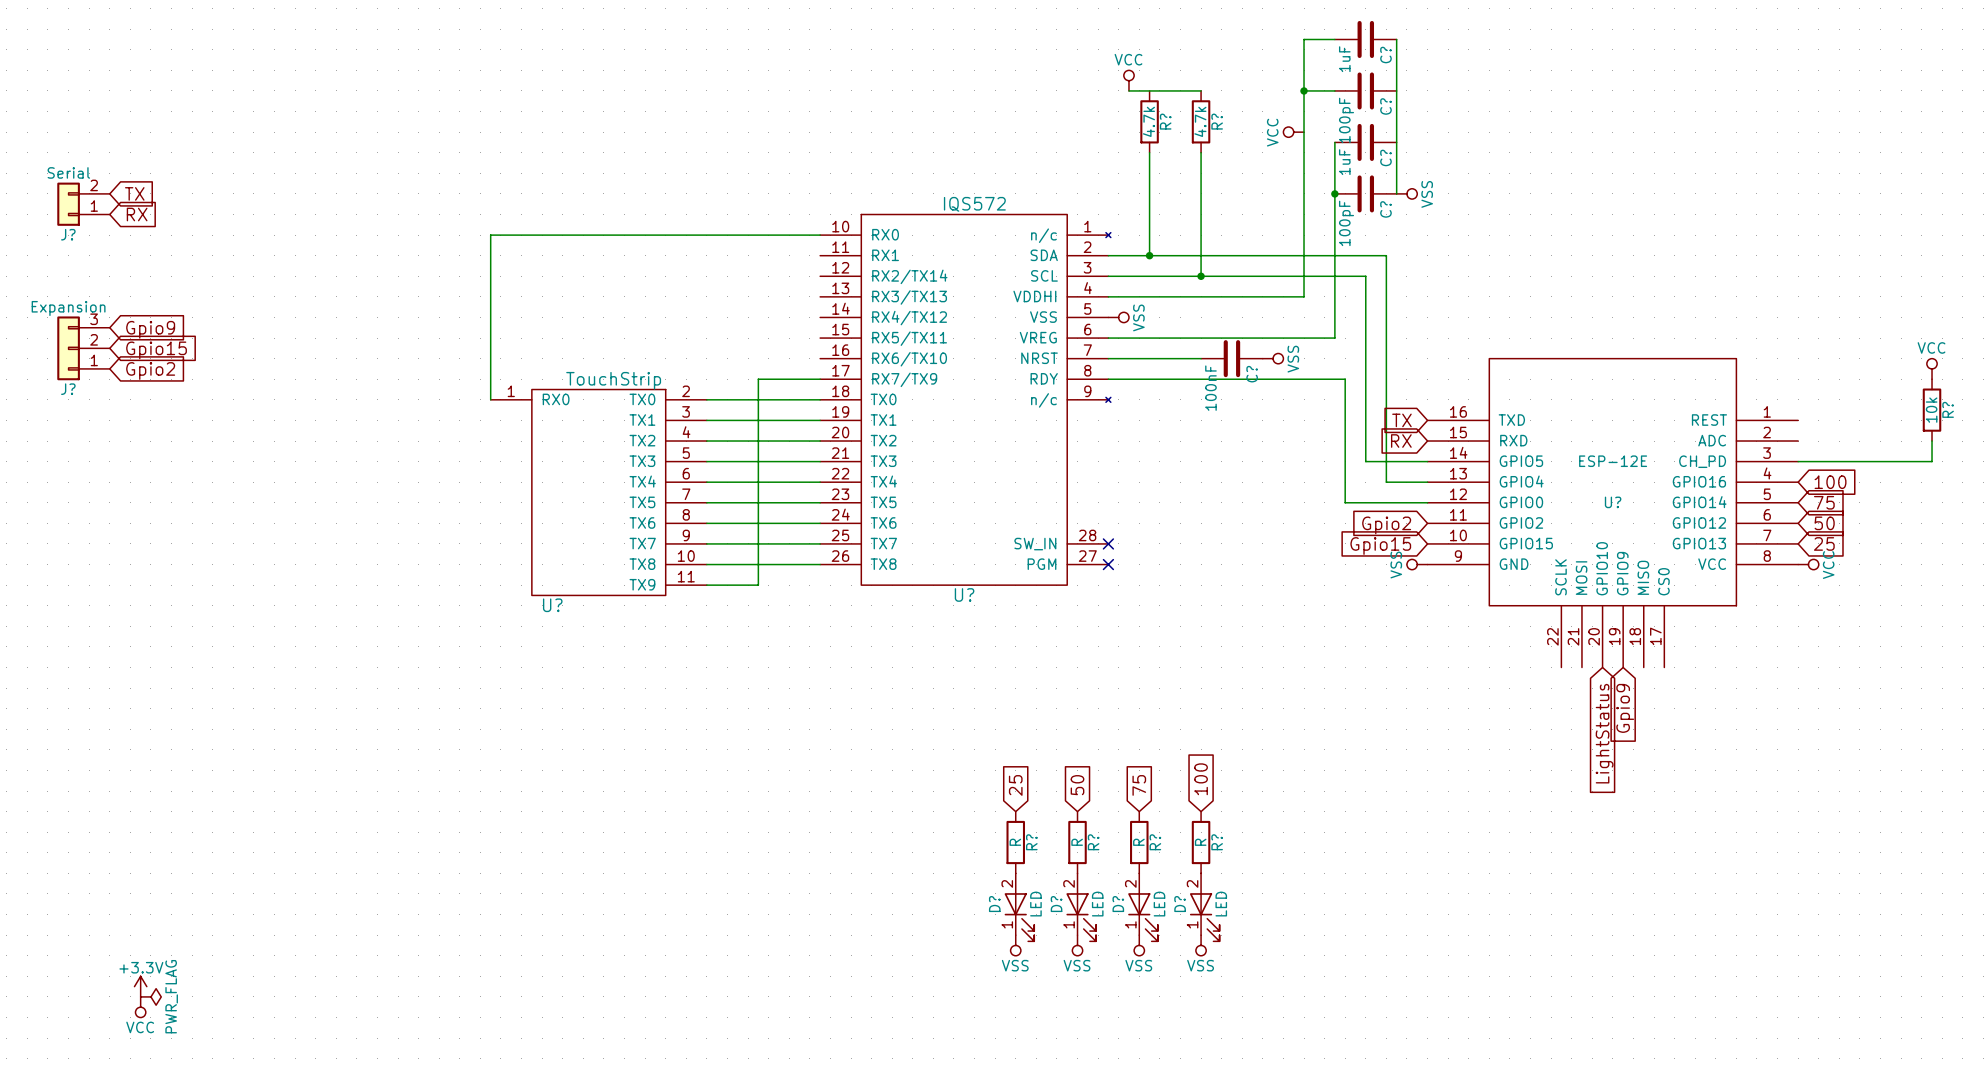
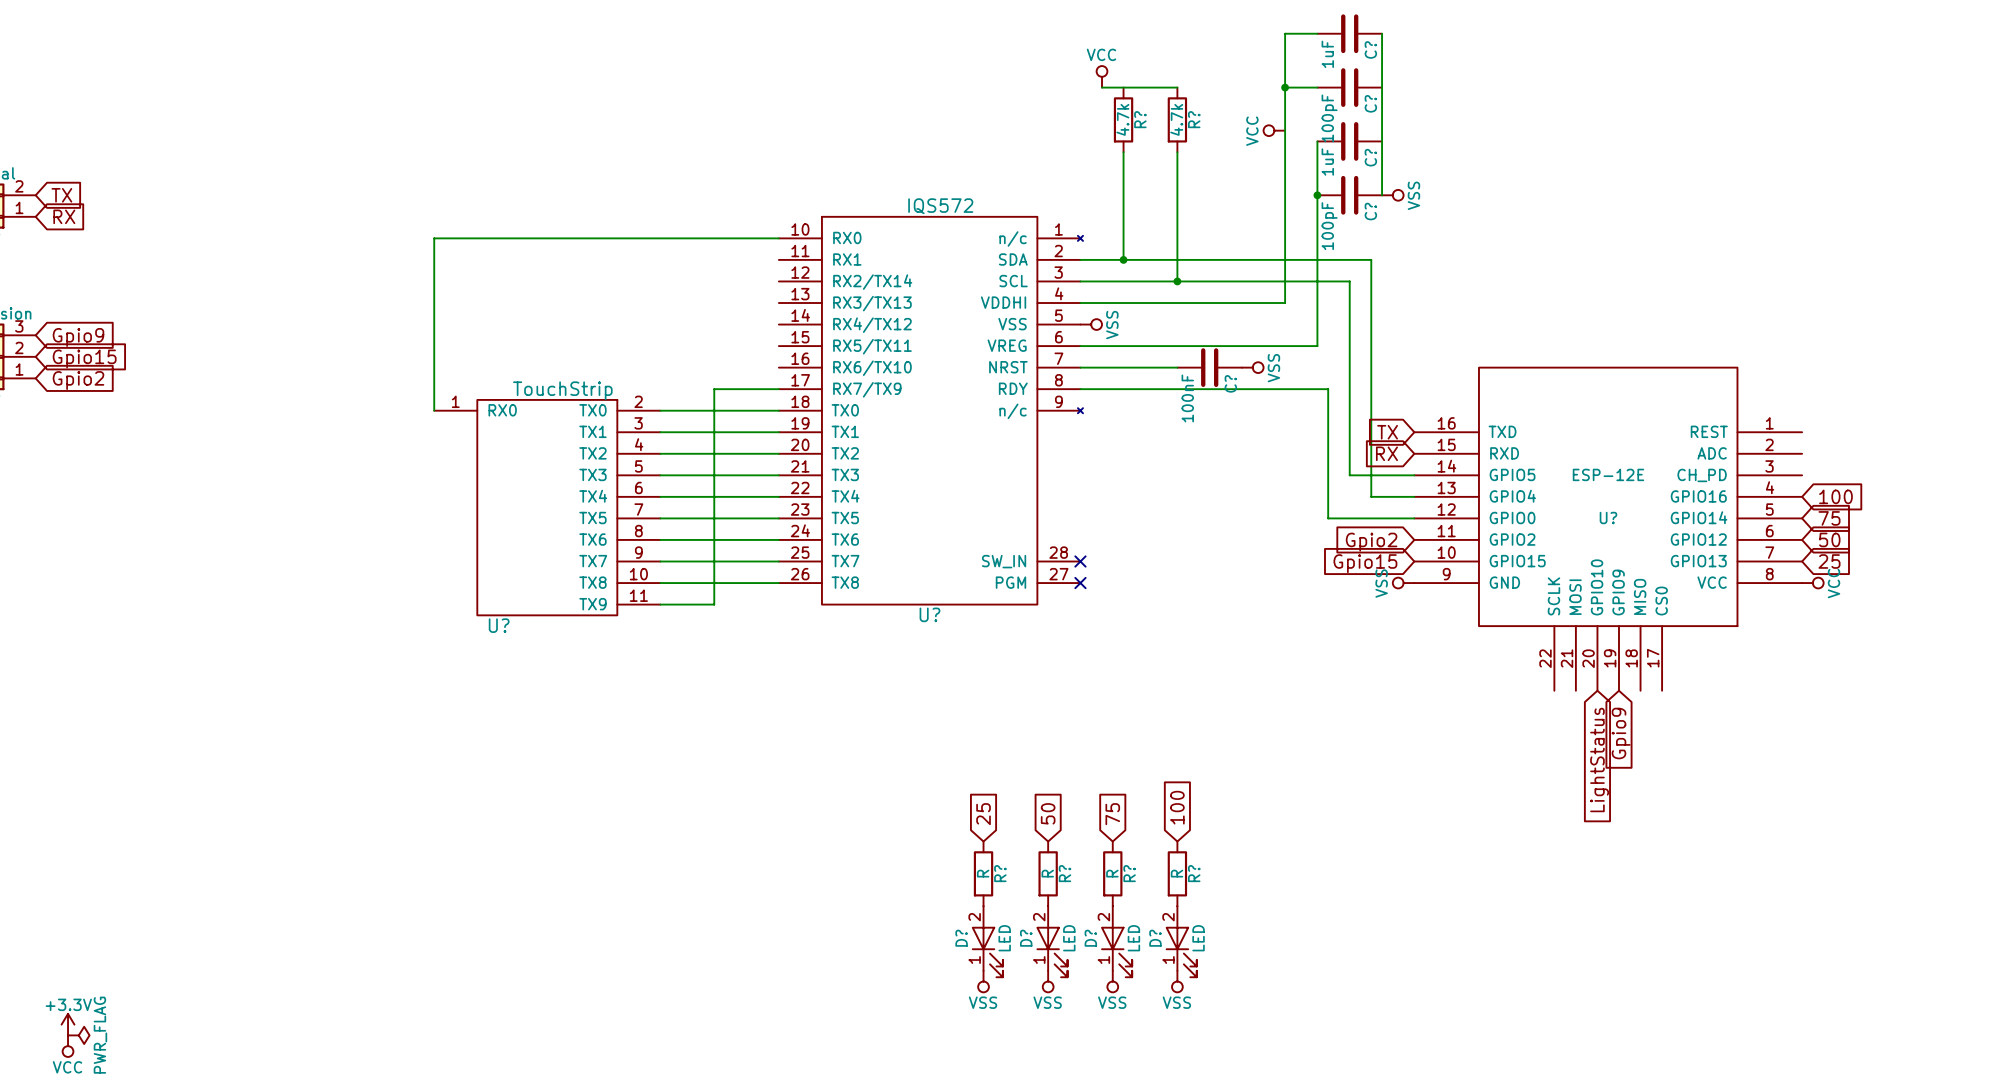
power symbol: VCC (1932, 368) -> none
R?: 10k (1932, 410) -> none
wire: (1932, 441) (1932, 461) (1798, 461) -> none

